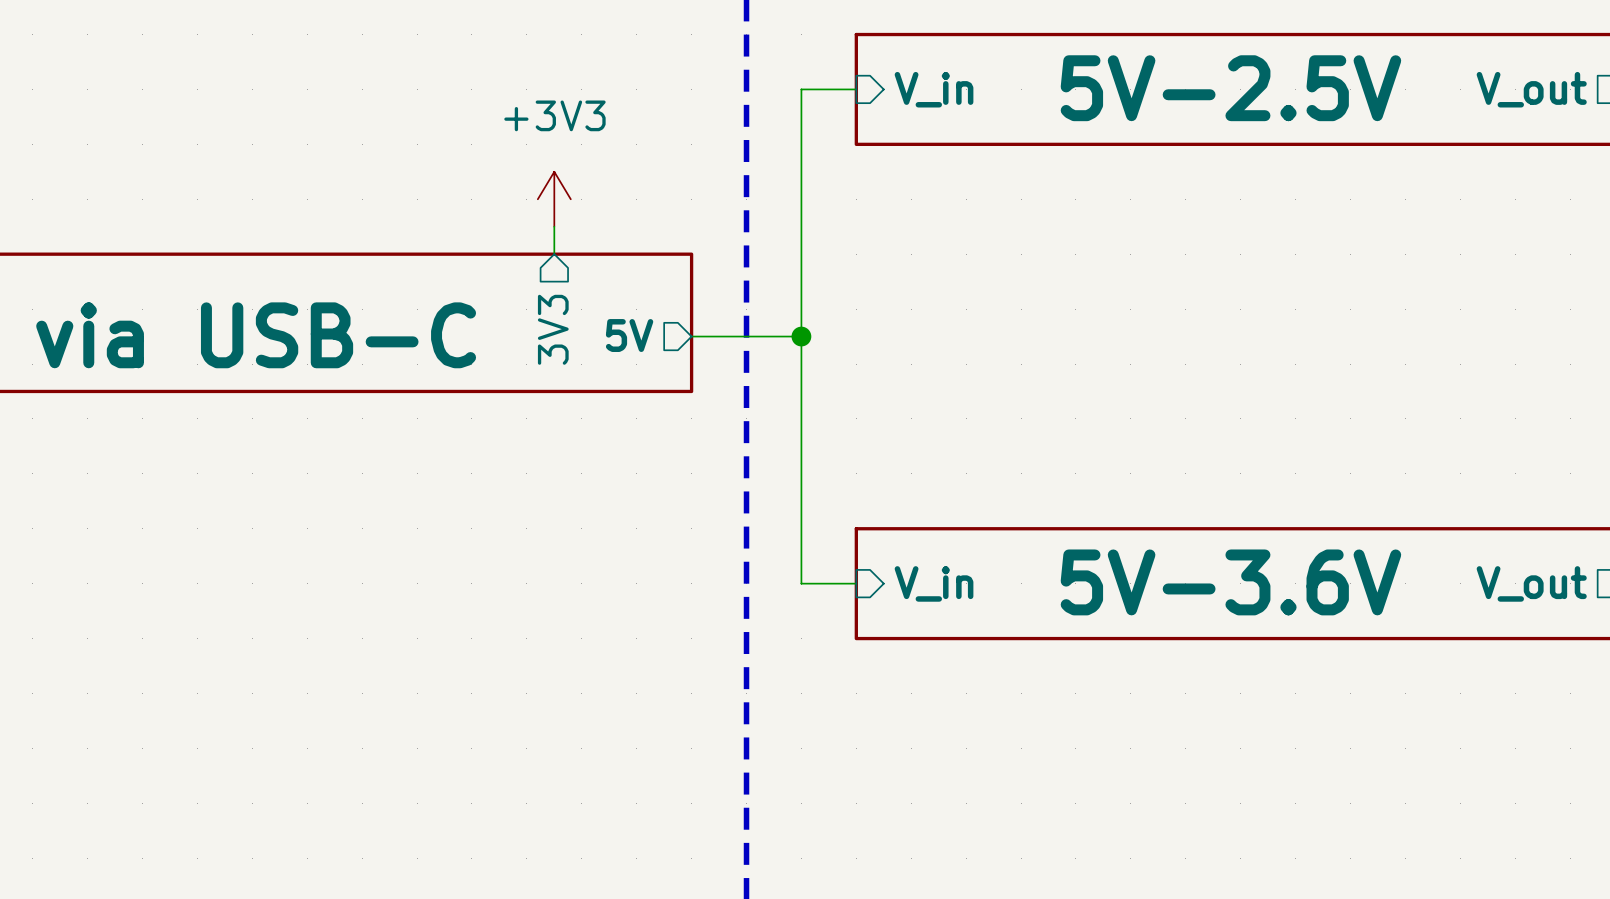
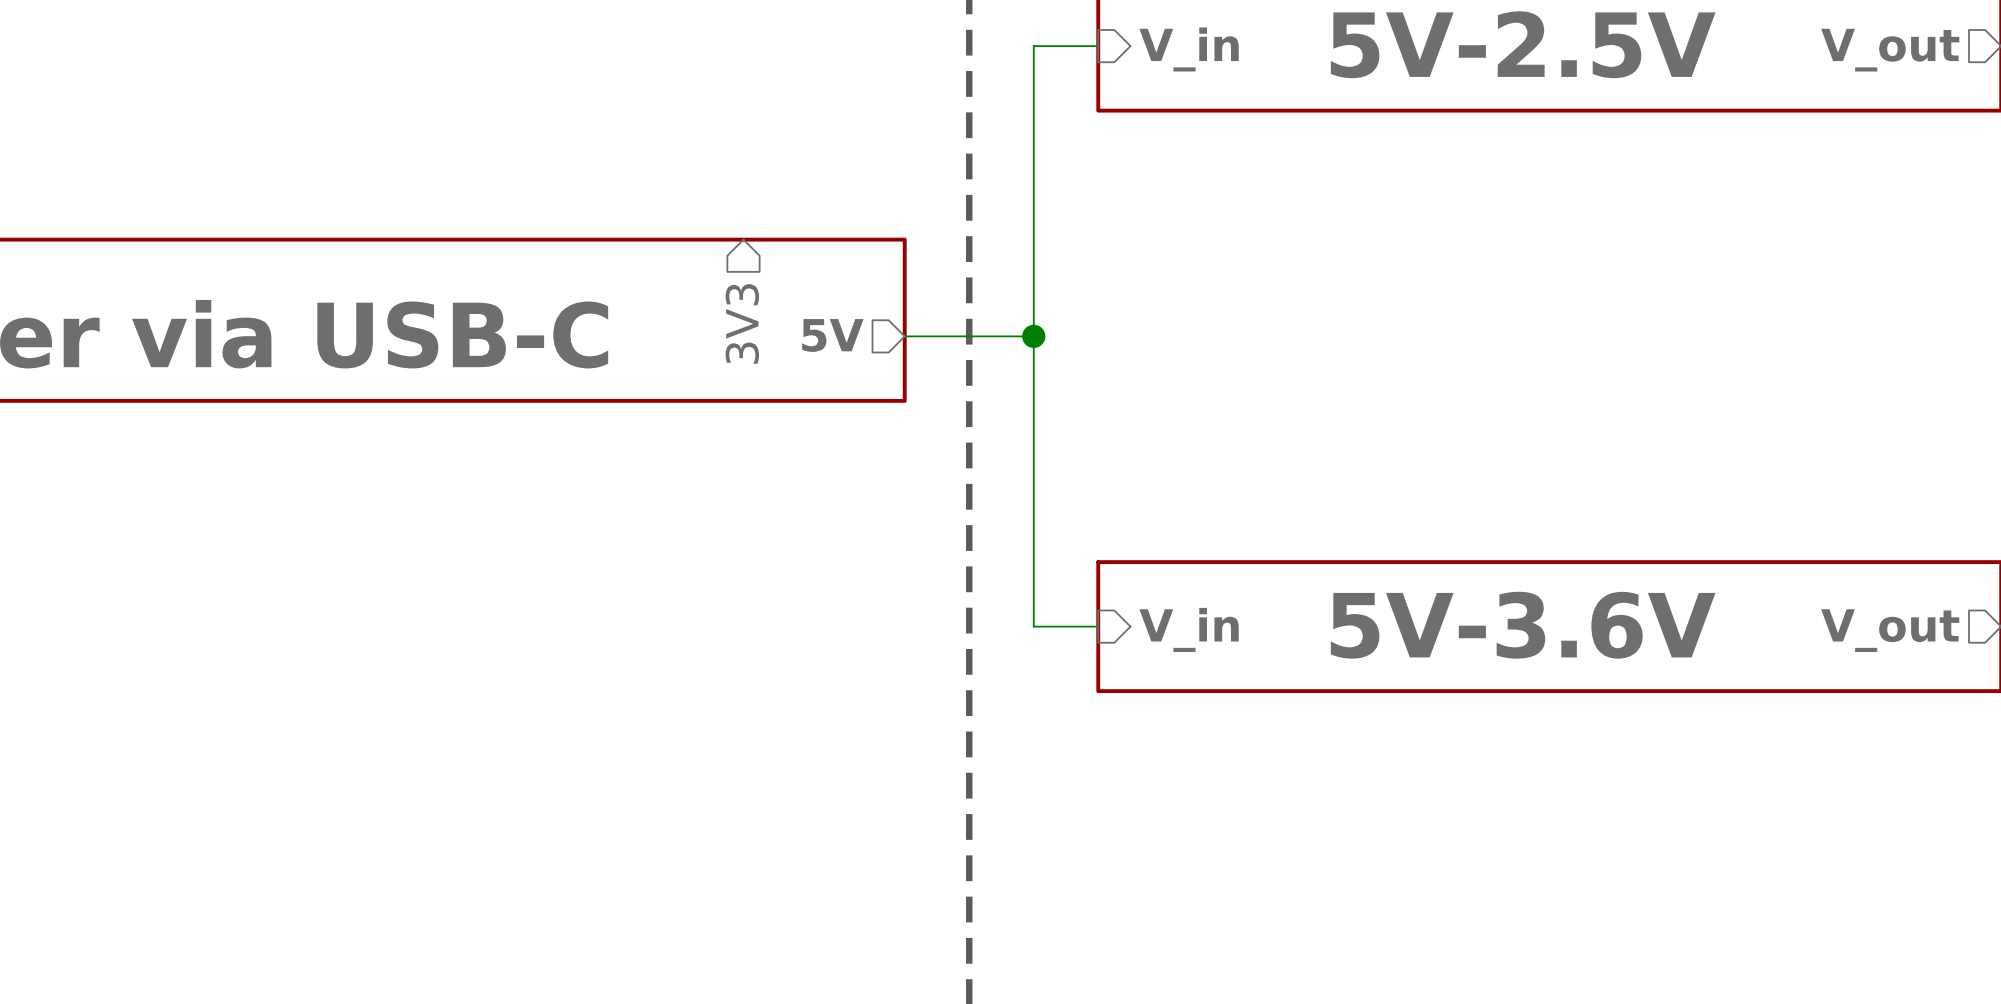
power symbol: +3V3 (554, 199) -> none
wire: (554, 226) (554, 254) -> none

